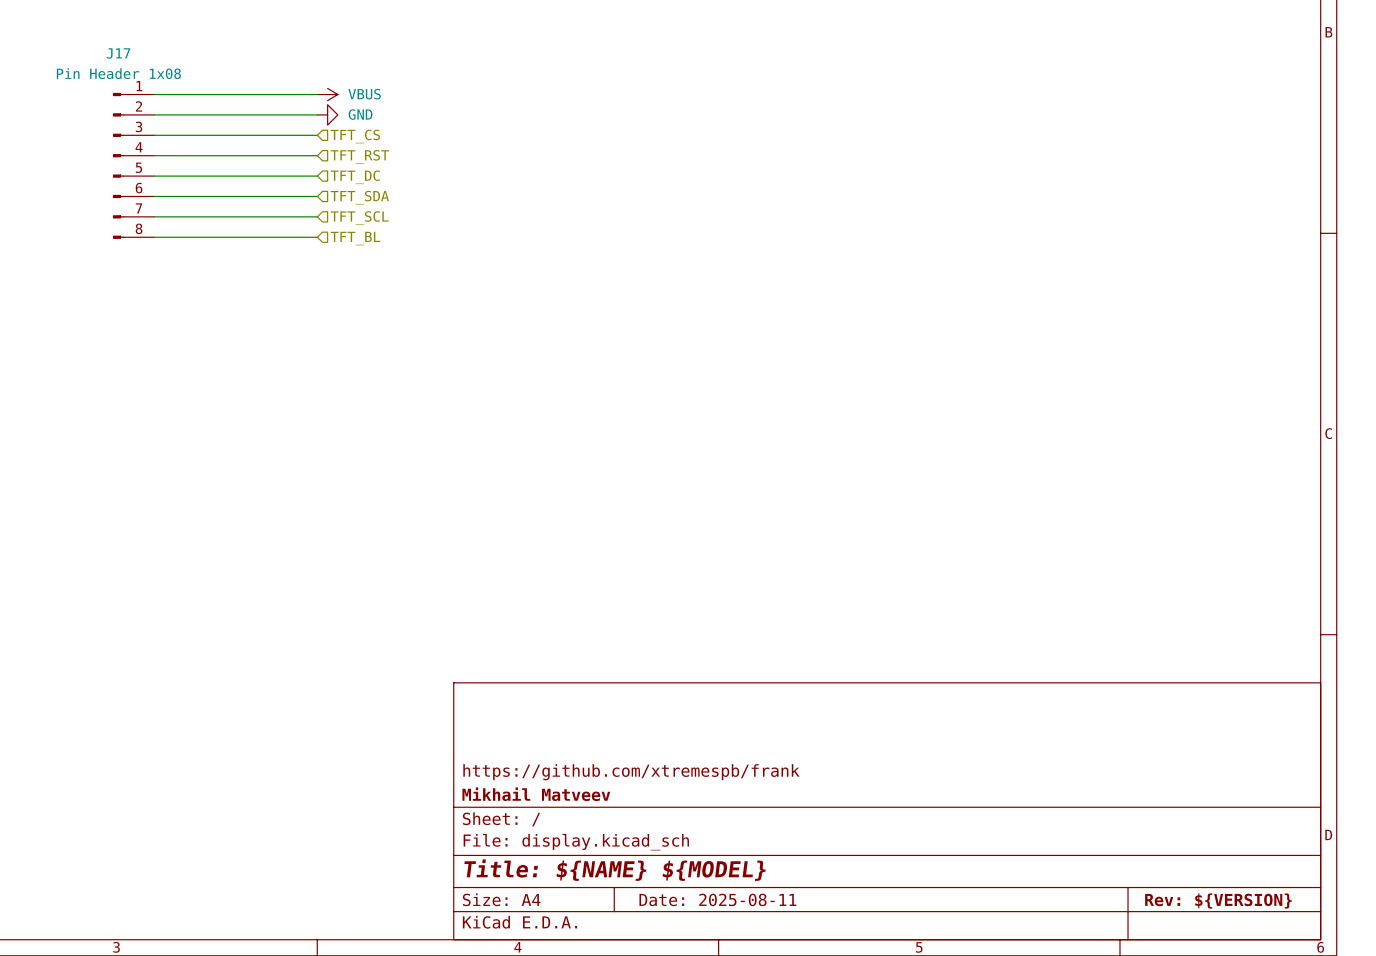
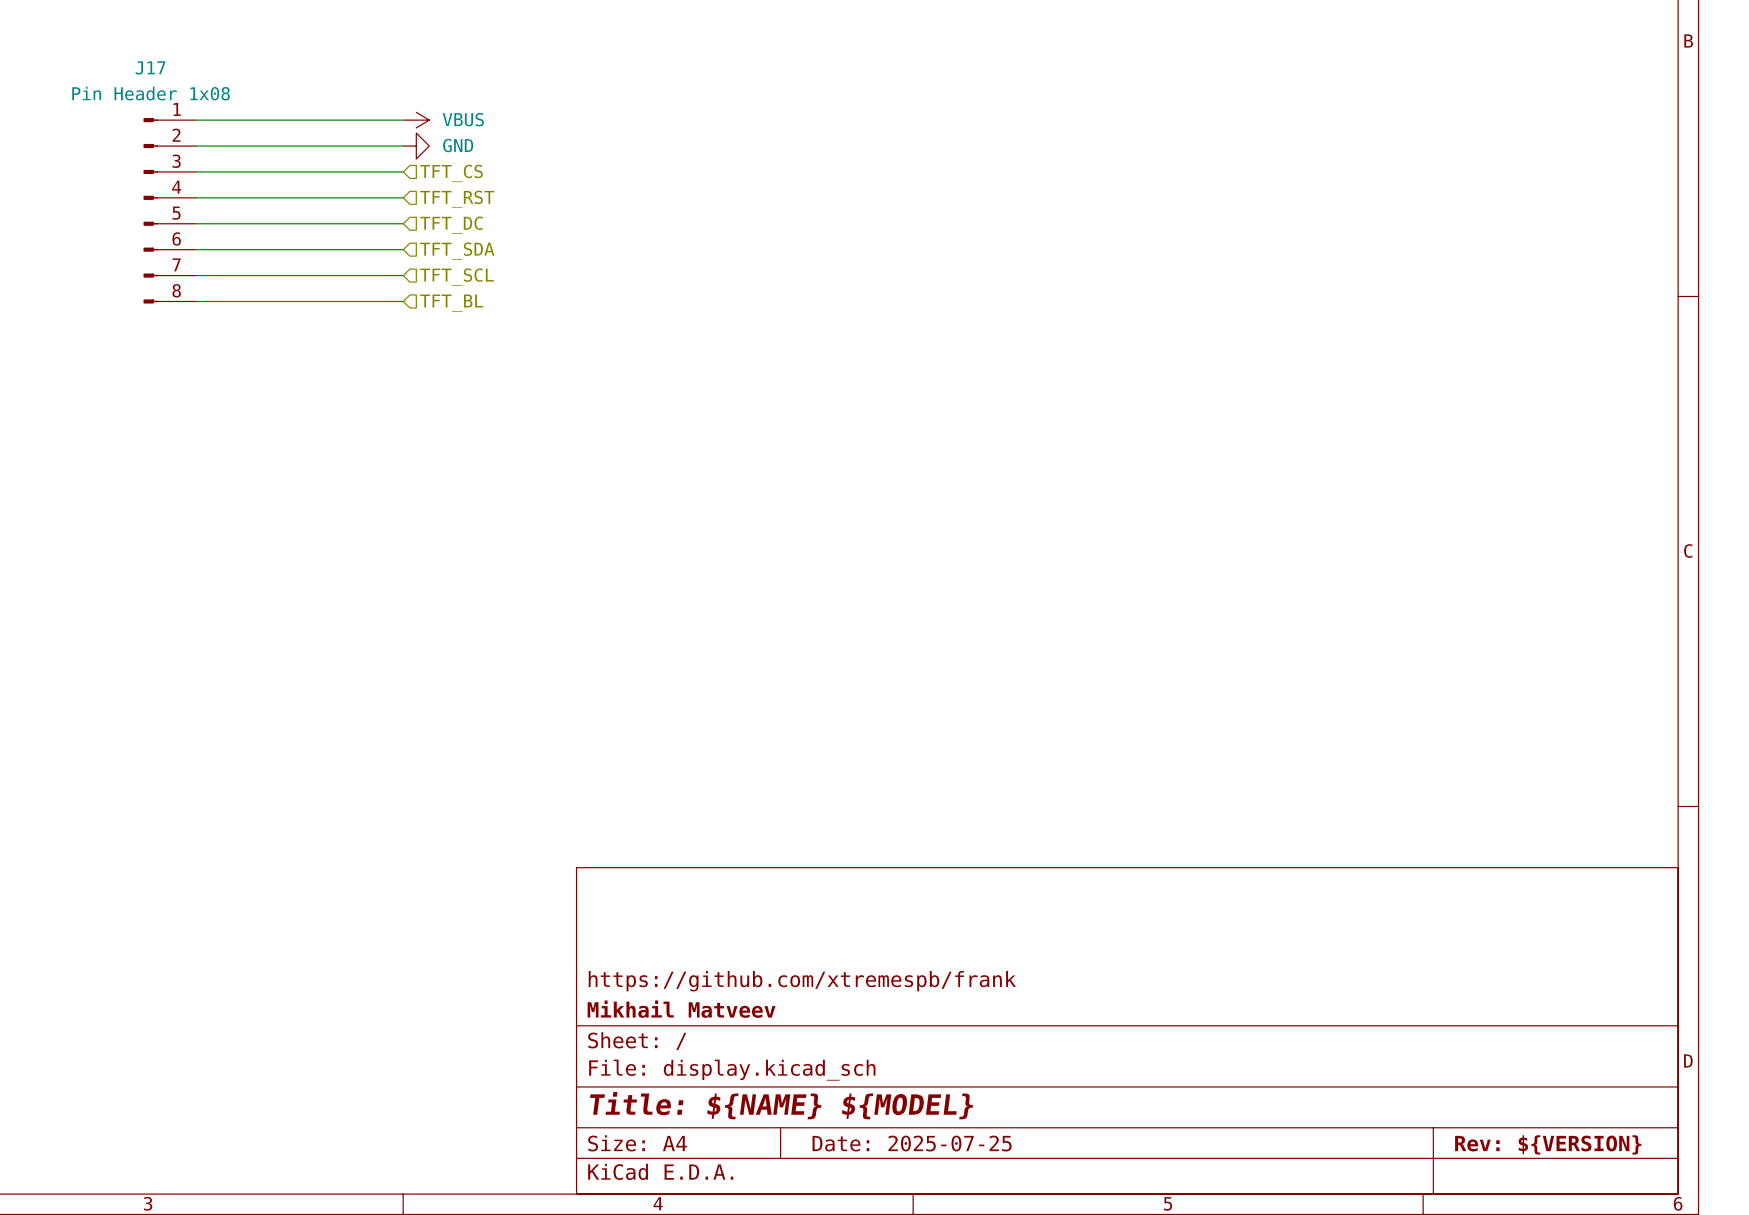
title block: Date: 2025-08-11 (717, 899) -> Date: 2025-07-25 (912, 1143)

